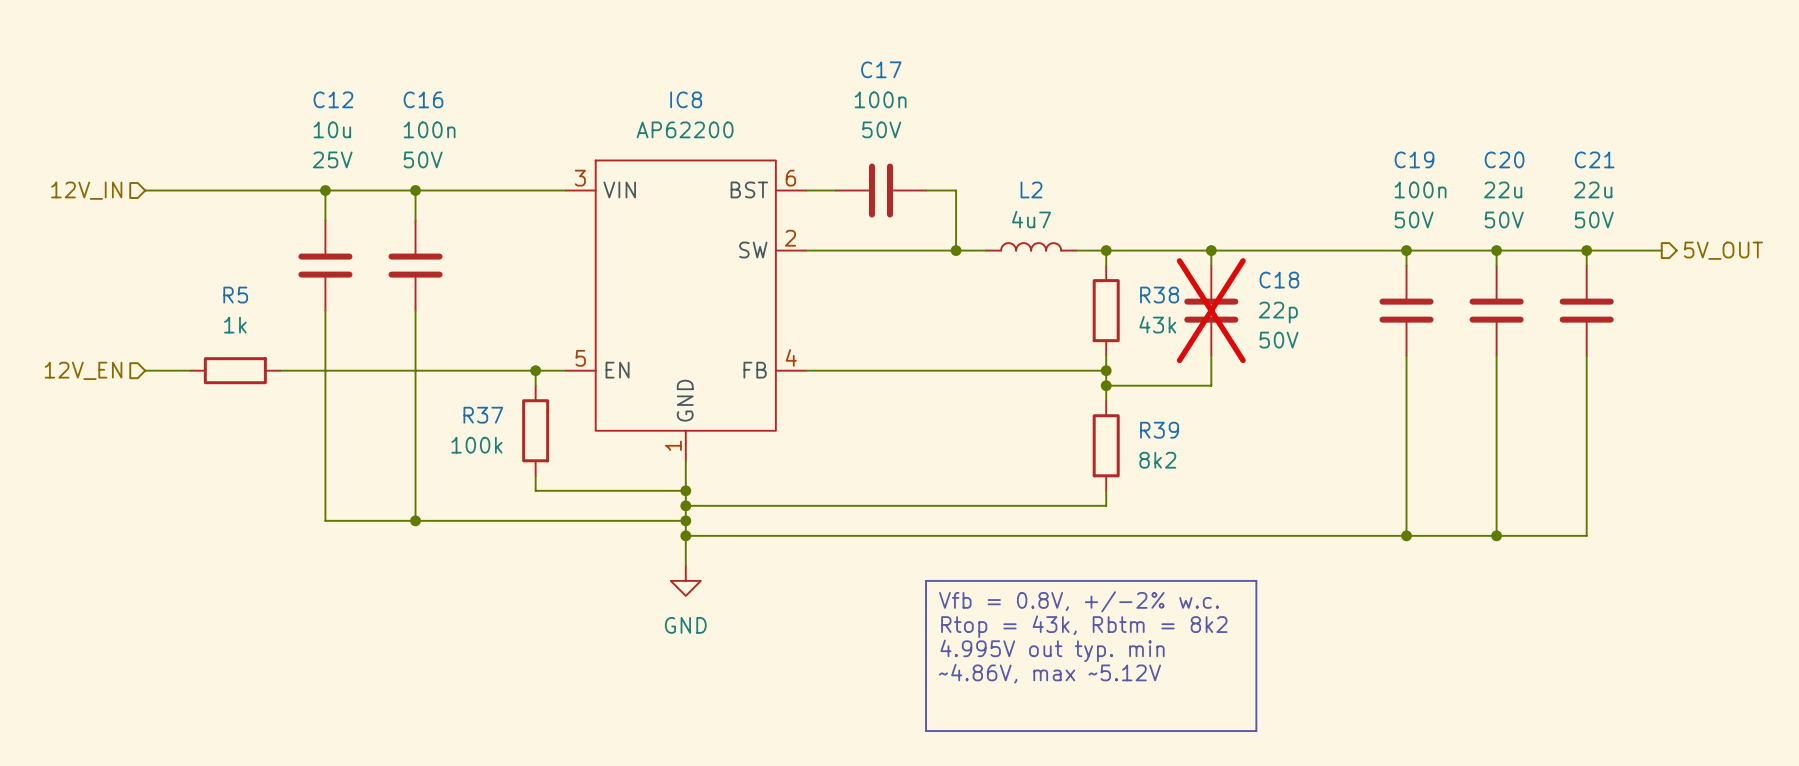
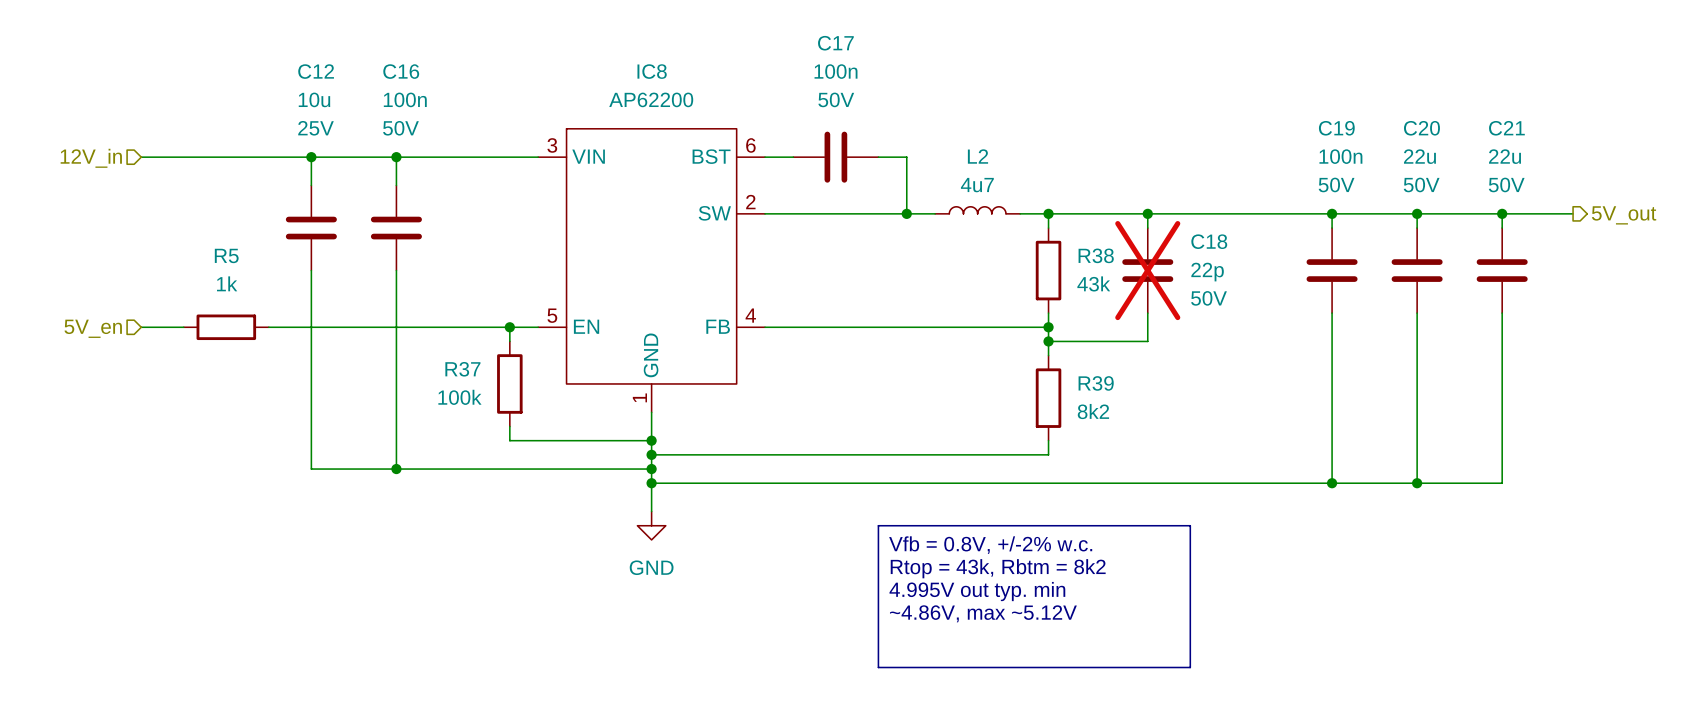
hierarchical label: 12V_IN (86, 190) -> 12V_in (91, 158)
hierarchical label: 5V_OUT (1723, 250) -> 5V_out (1624, 215)
hierarchical label: 12V_EN (83, 370) -> 5V_en (93, 328)

